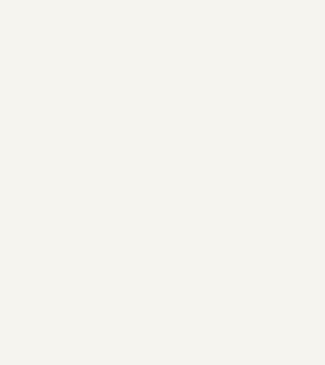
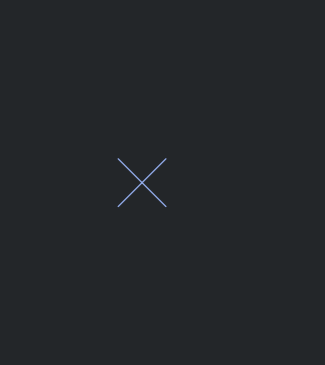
no-connect mark: none -> (142, 182)

